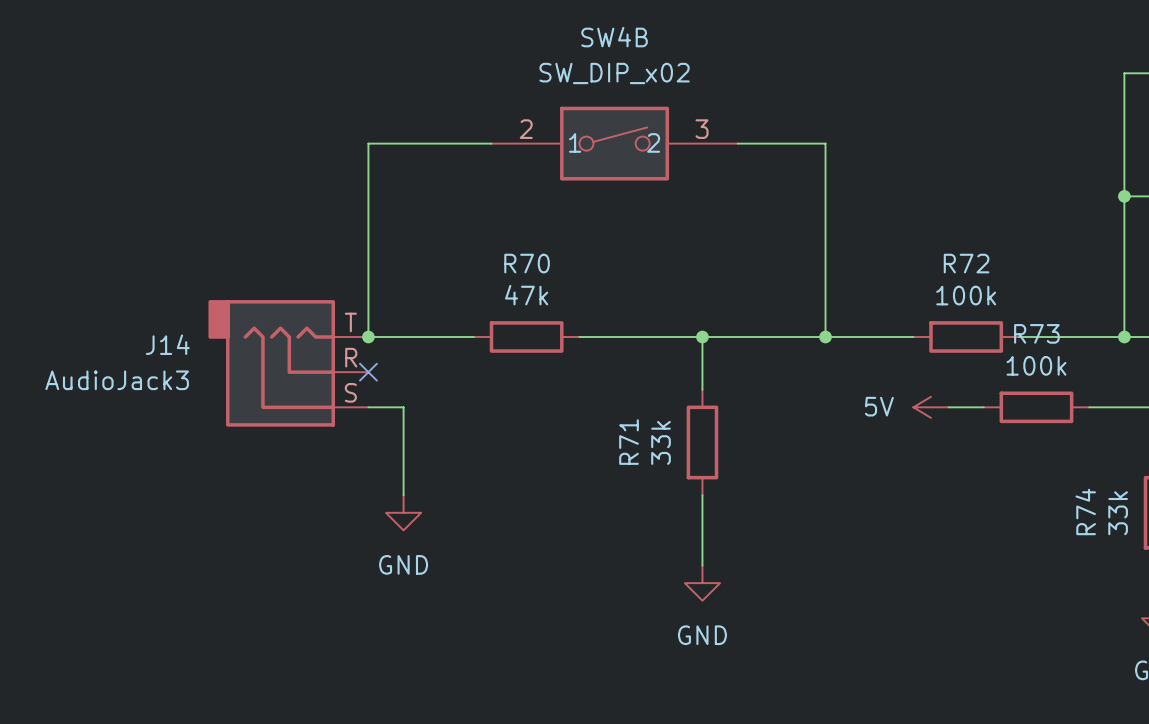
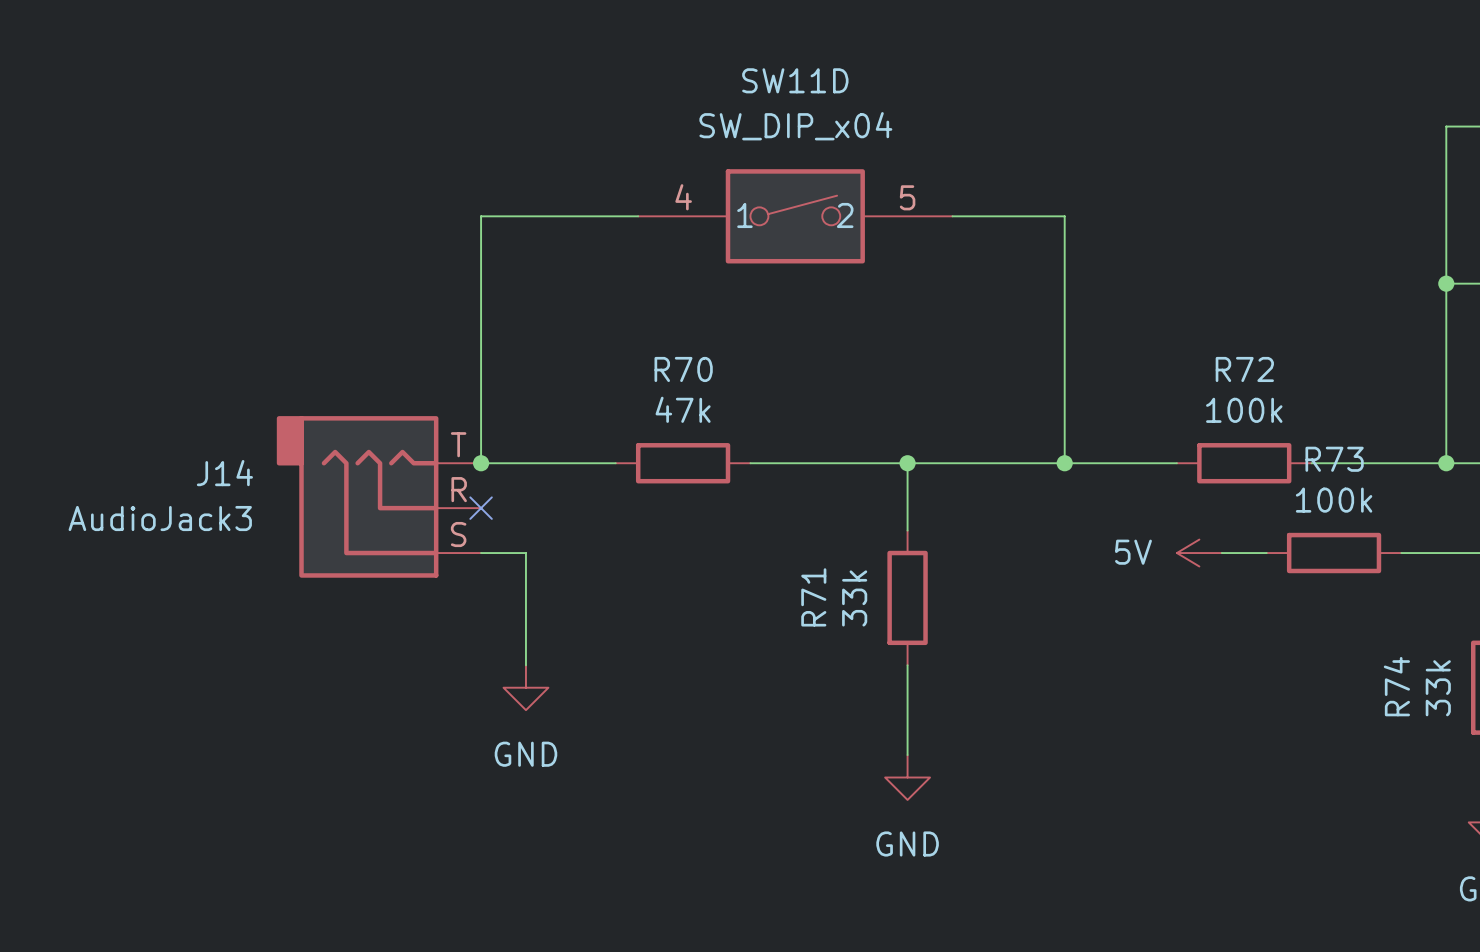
SW4B name: SW4B (614, 37) -> SW11D (795, 80)
SW4B value: SW_DIP_x02 (614, 73) -> SW_DIP_x04 (795, 126)
SW4B pin number: 2 (526, 129) -> 4 (683, 197)
SW4B pin number: 3 (702, 129) -> 5 (907, 197)

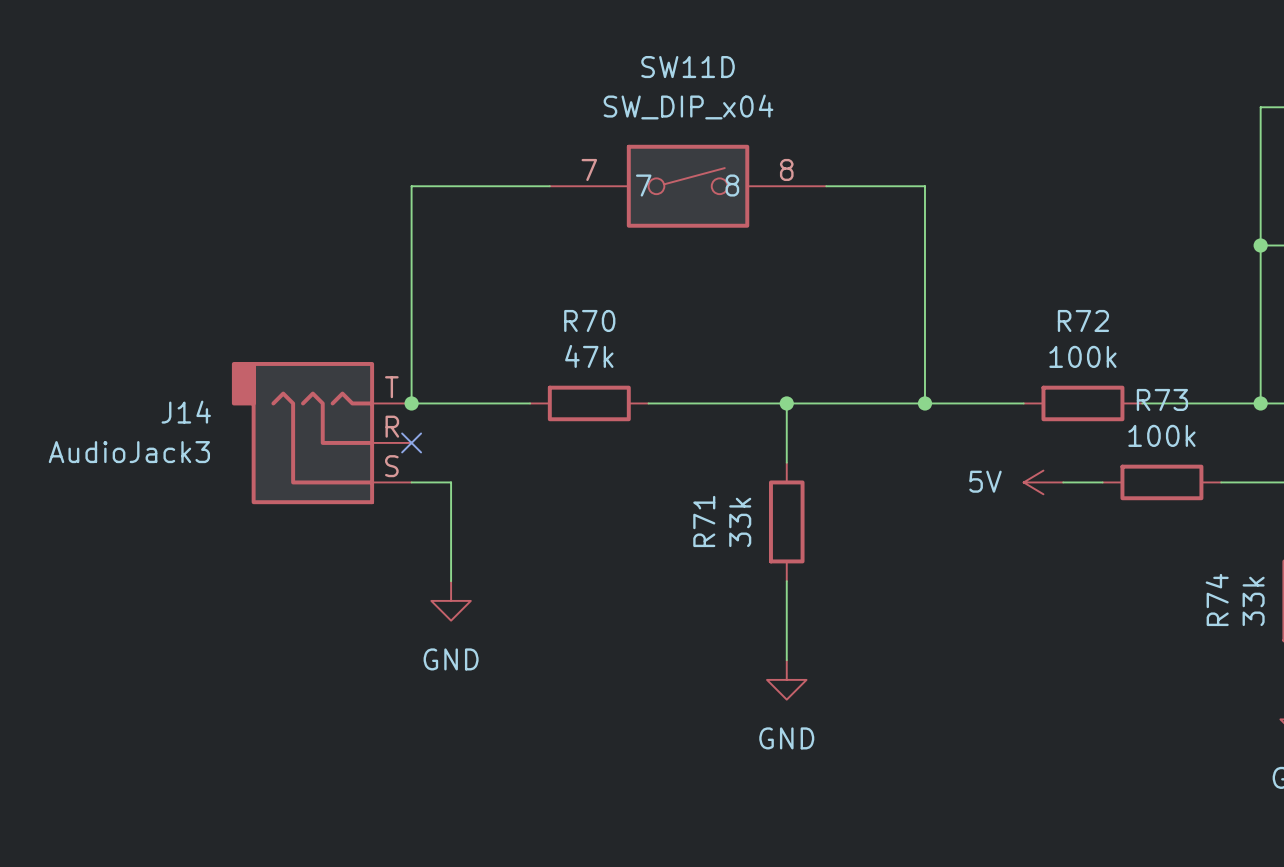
SW11D pin number: 4 (683, 197) -> 7 (589, 169)
SW11D pin number: 5 (907, 197) -> 8 (786, 169)
SW11D pin name: 1 (744, 215) -> 7 (643, 185)
SW11D pin name: 2 (845, 215) -> 8 (732, 185)

